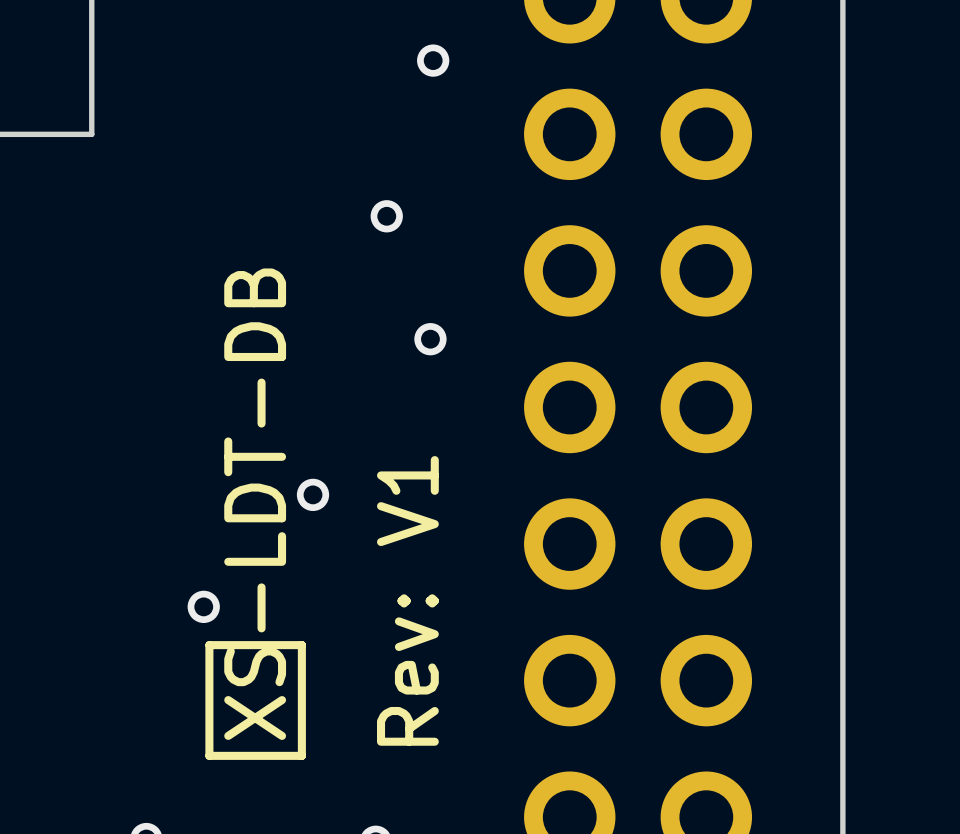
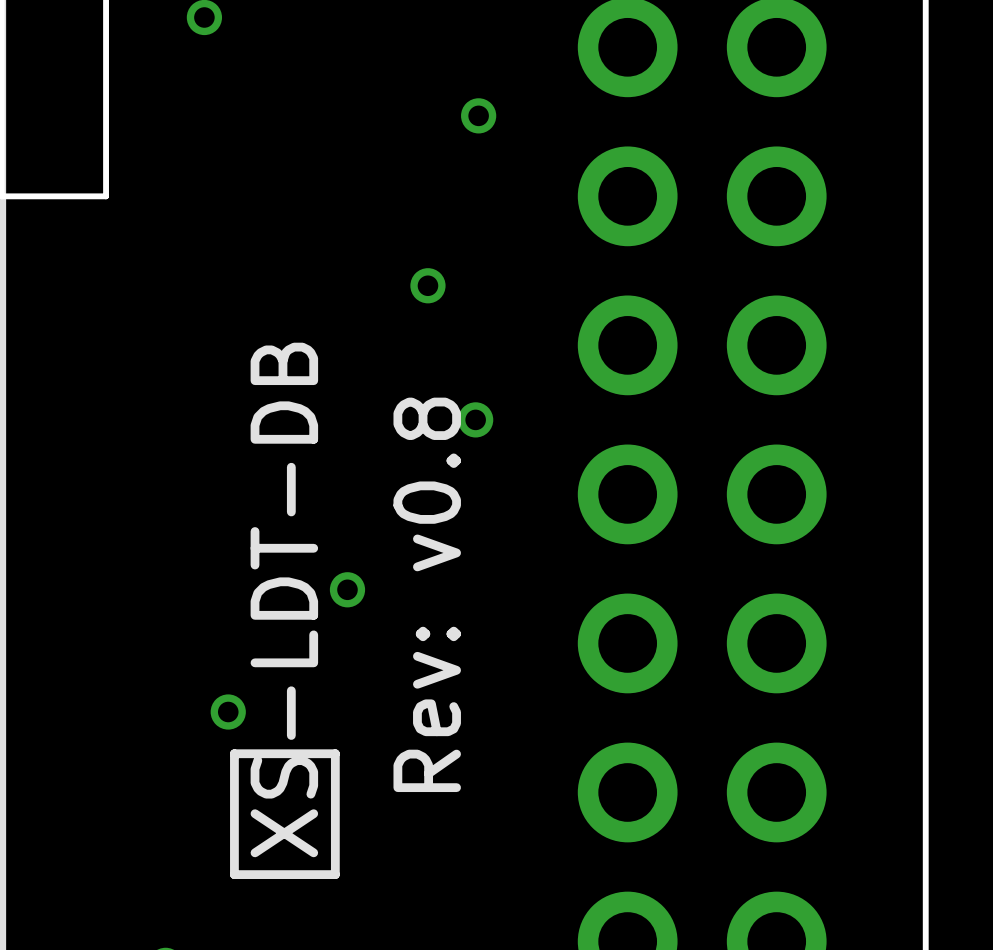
text: Rev: V1 (407, 600) -> Rev: v0.8 (427, 594)

